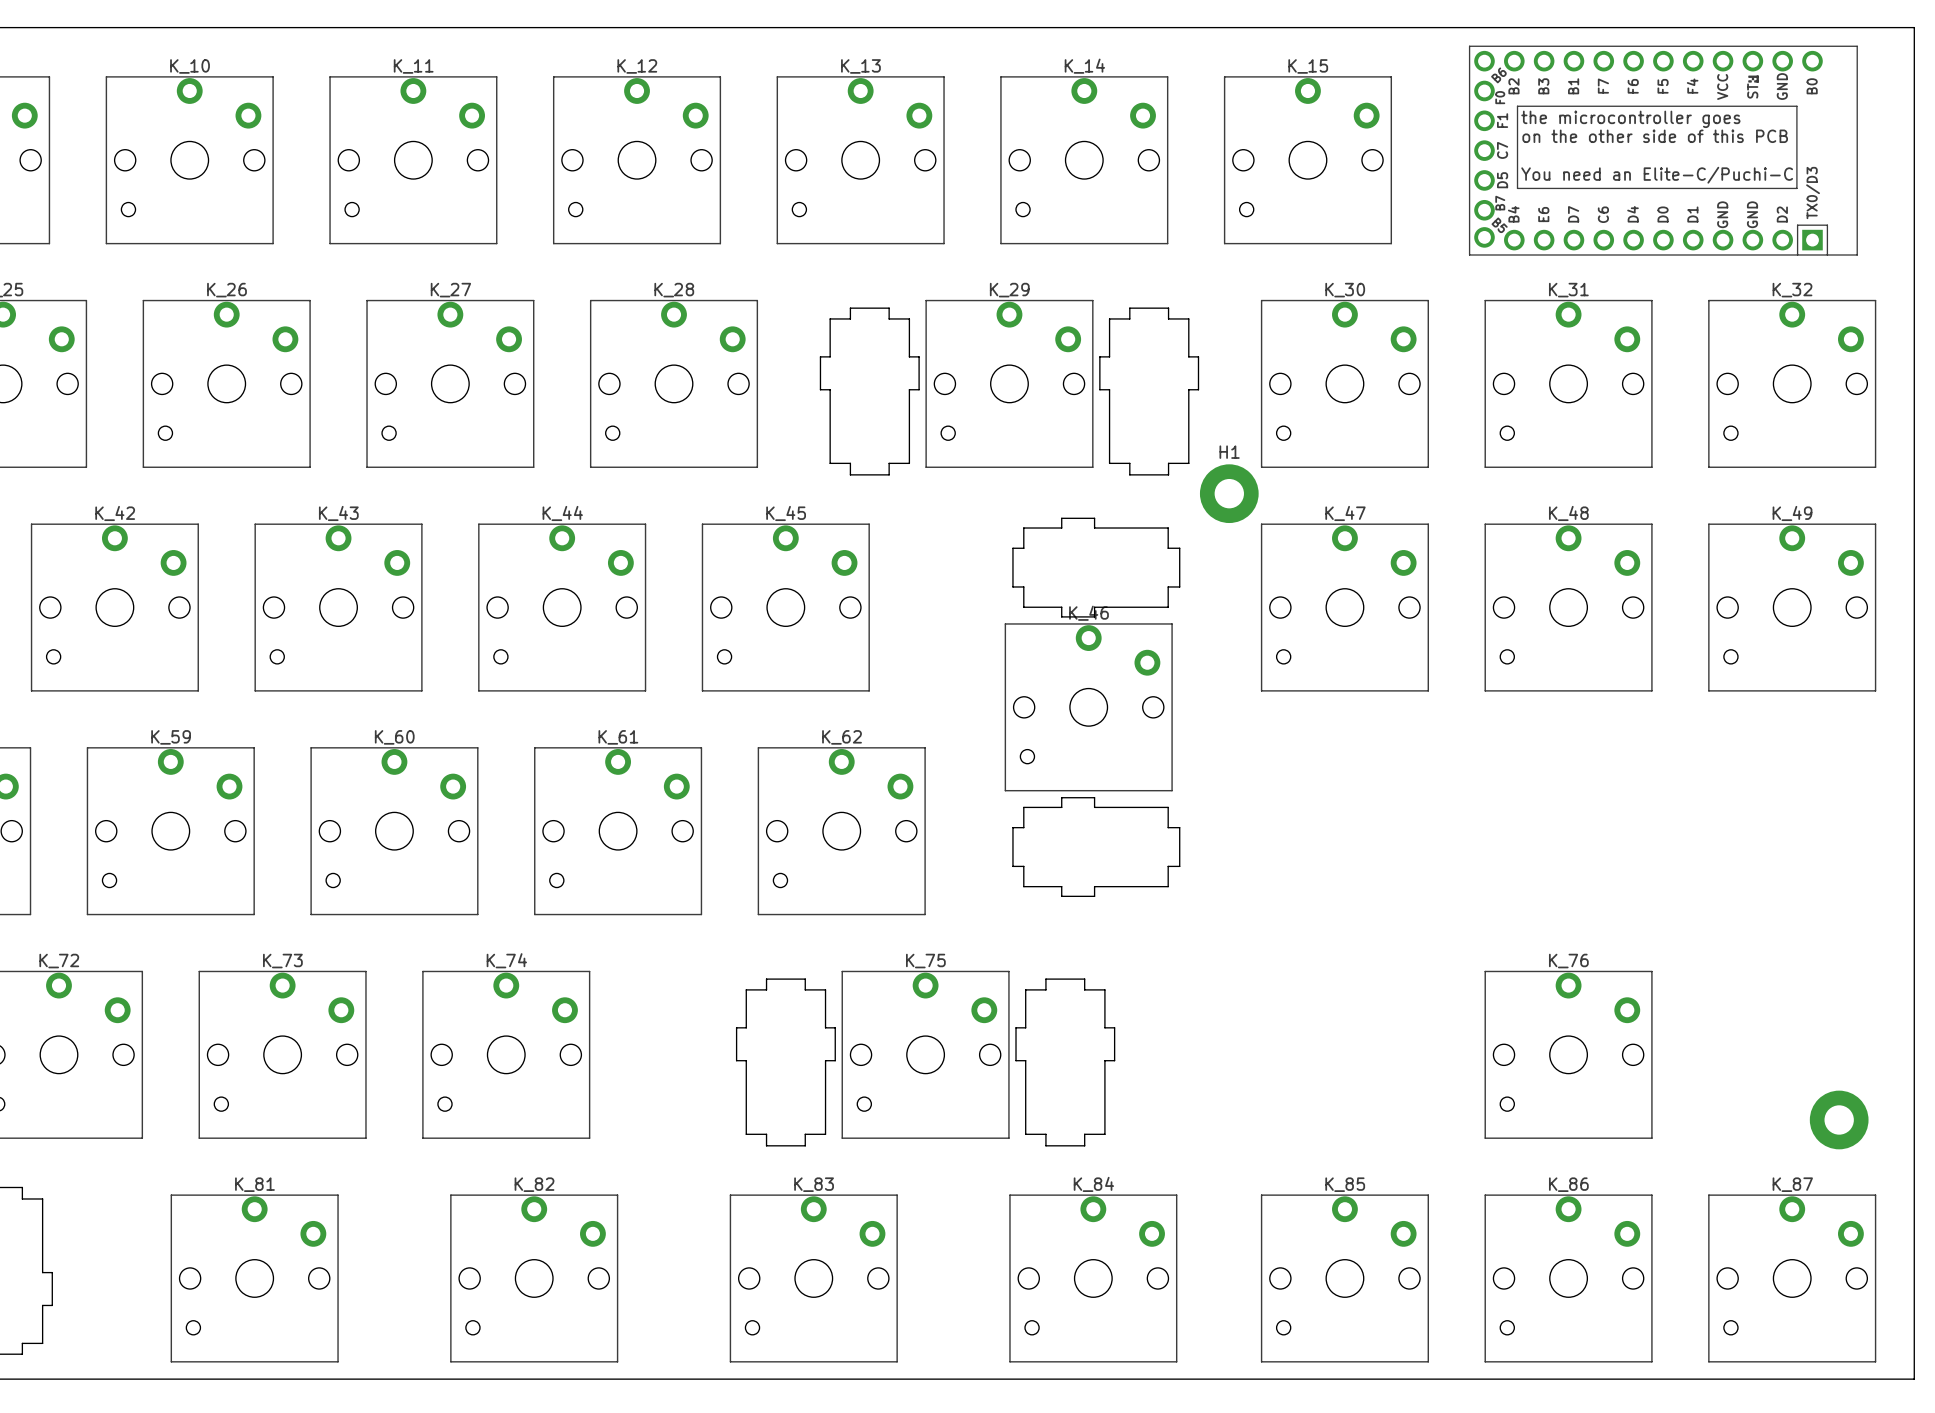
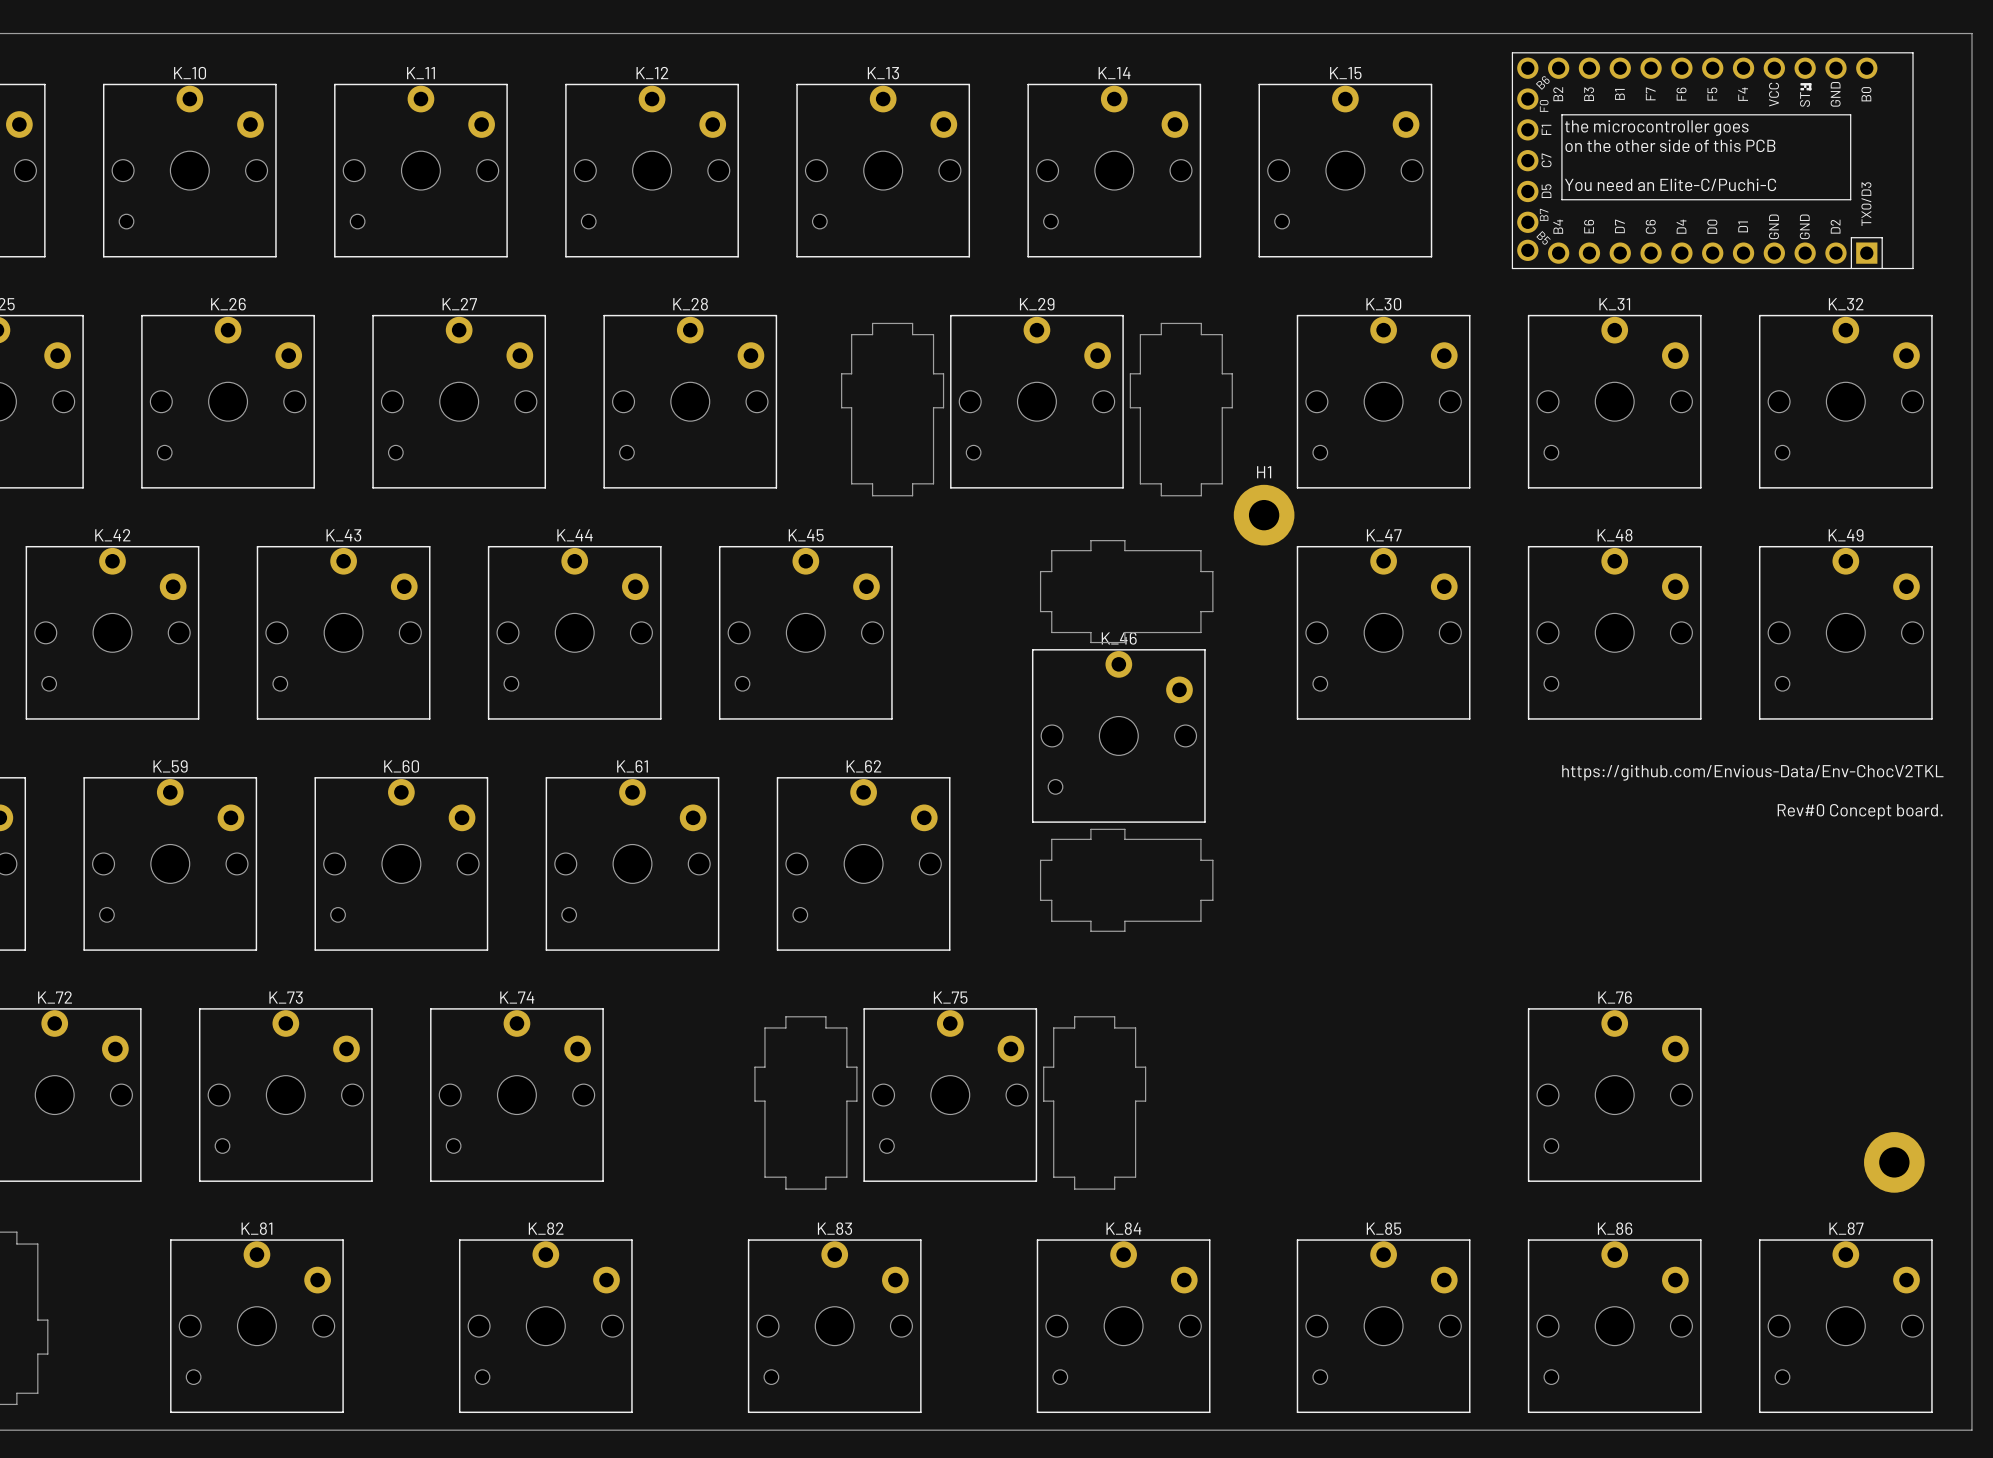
text: none -> https://github.com/Envious-Data/Env-ChocV2TKL (1752, 772)
text: none -> Rev#0 Concept board. (1860, 811)

